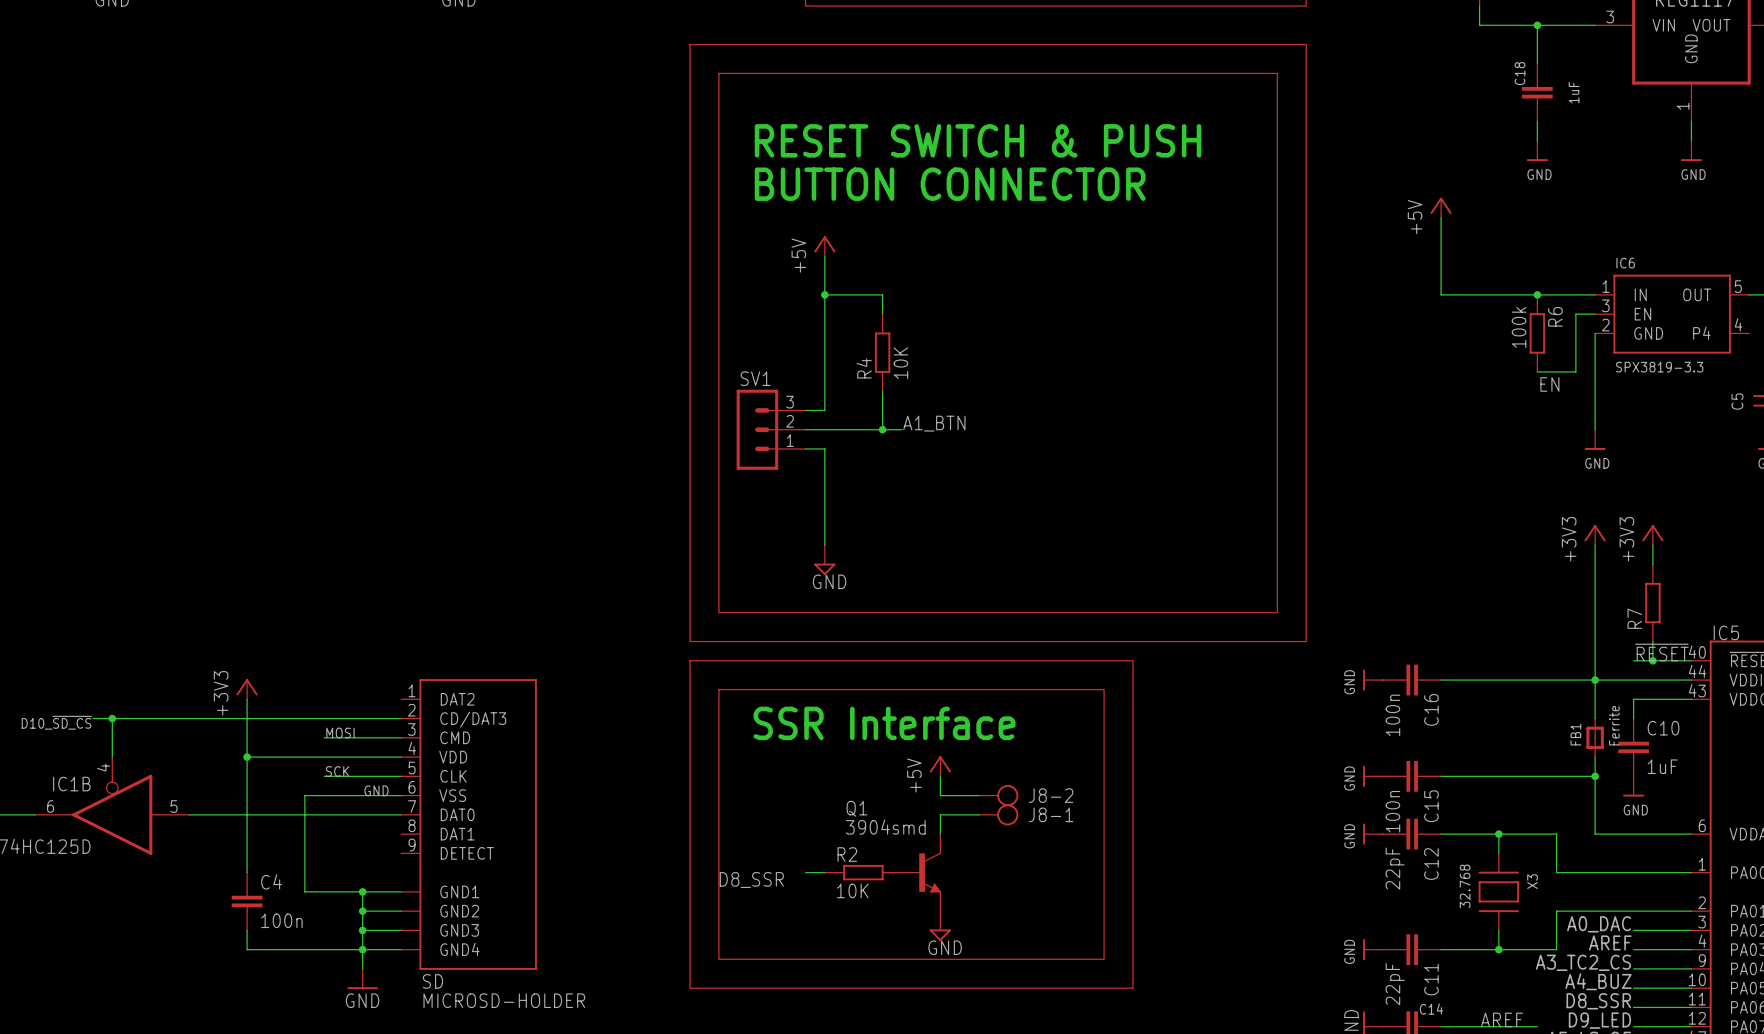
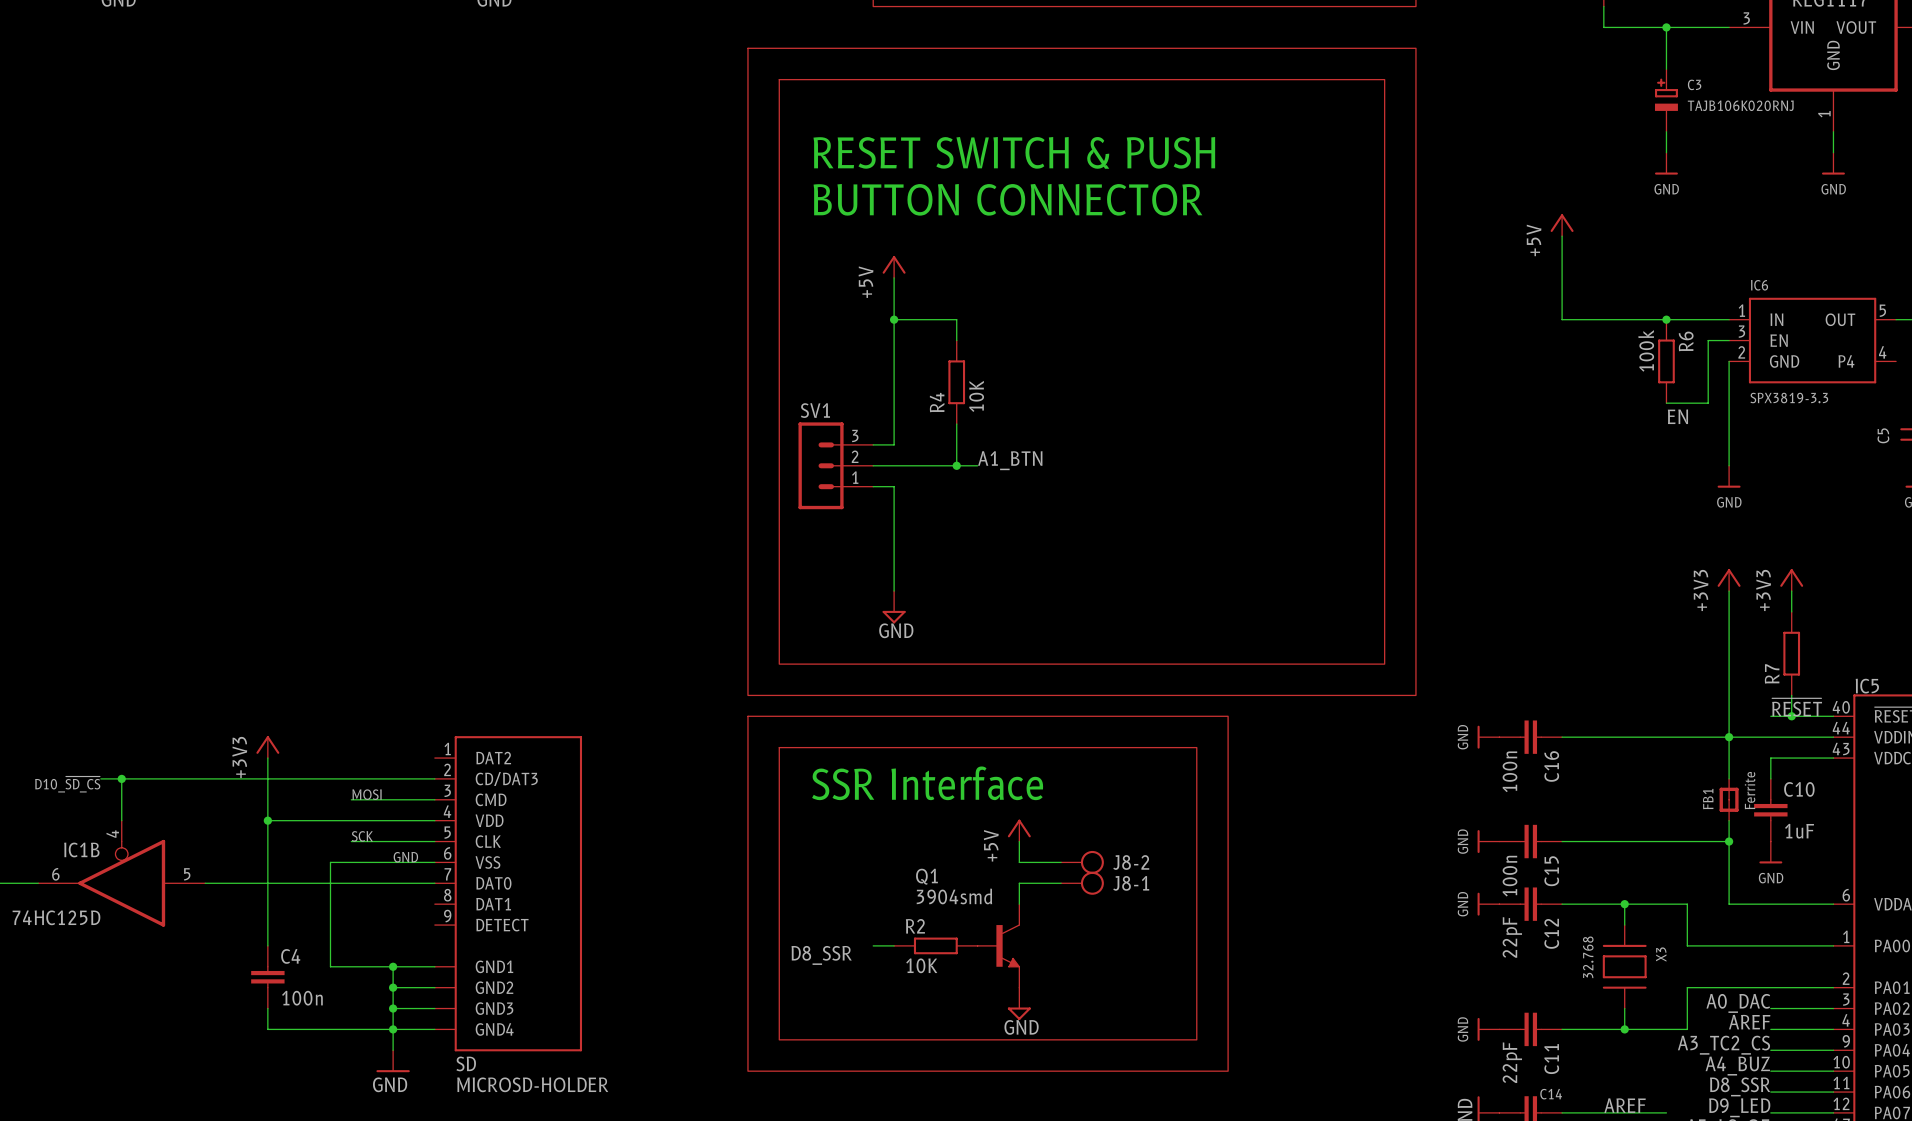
C18: 1uF (1537, 92) -> none
C3: none -> TAJB106K020RNJ (1666, 100)

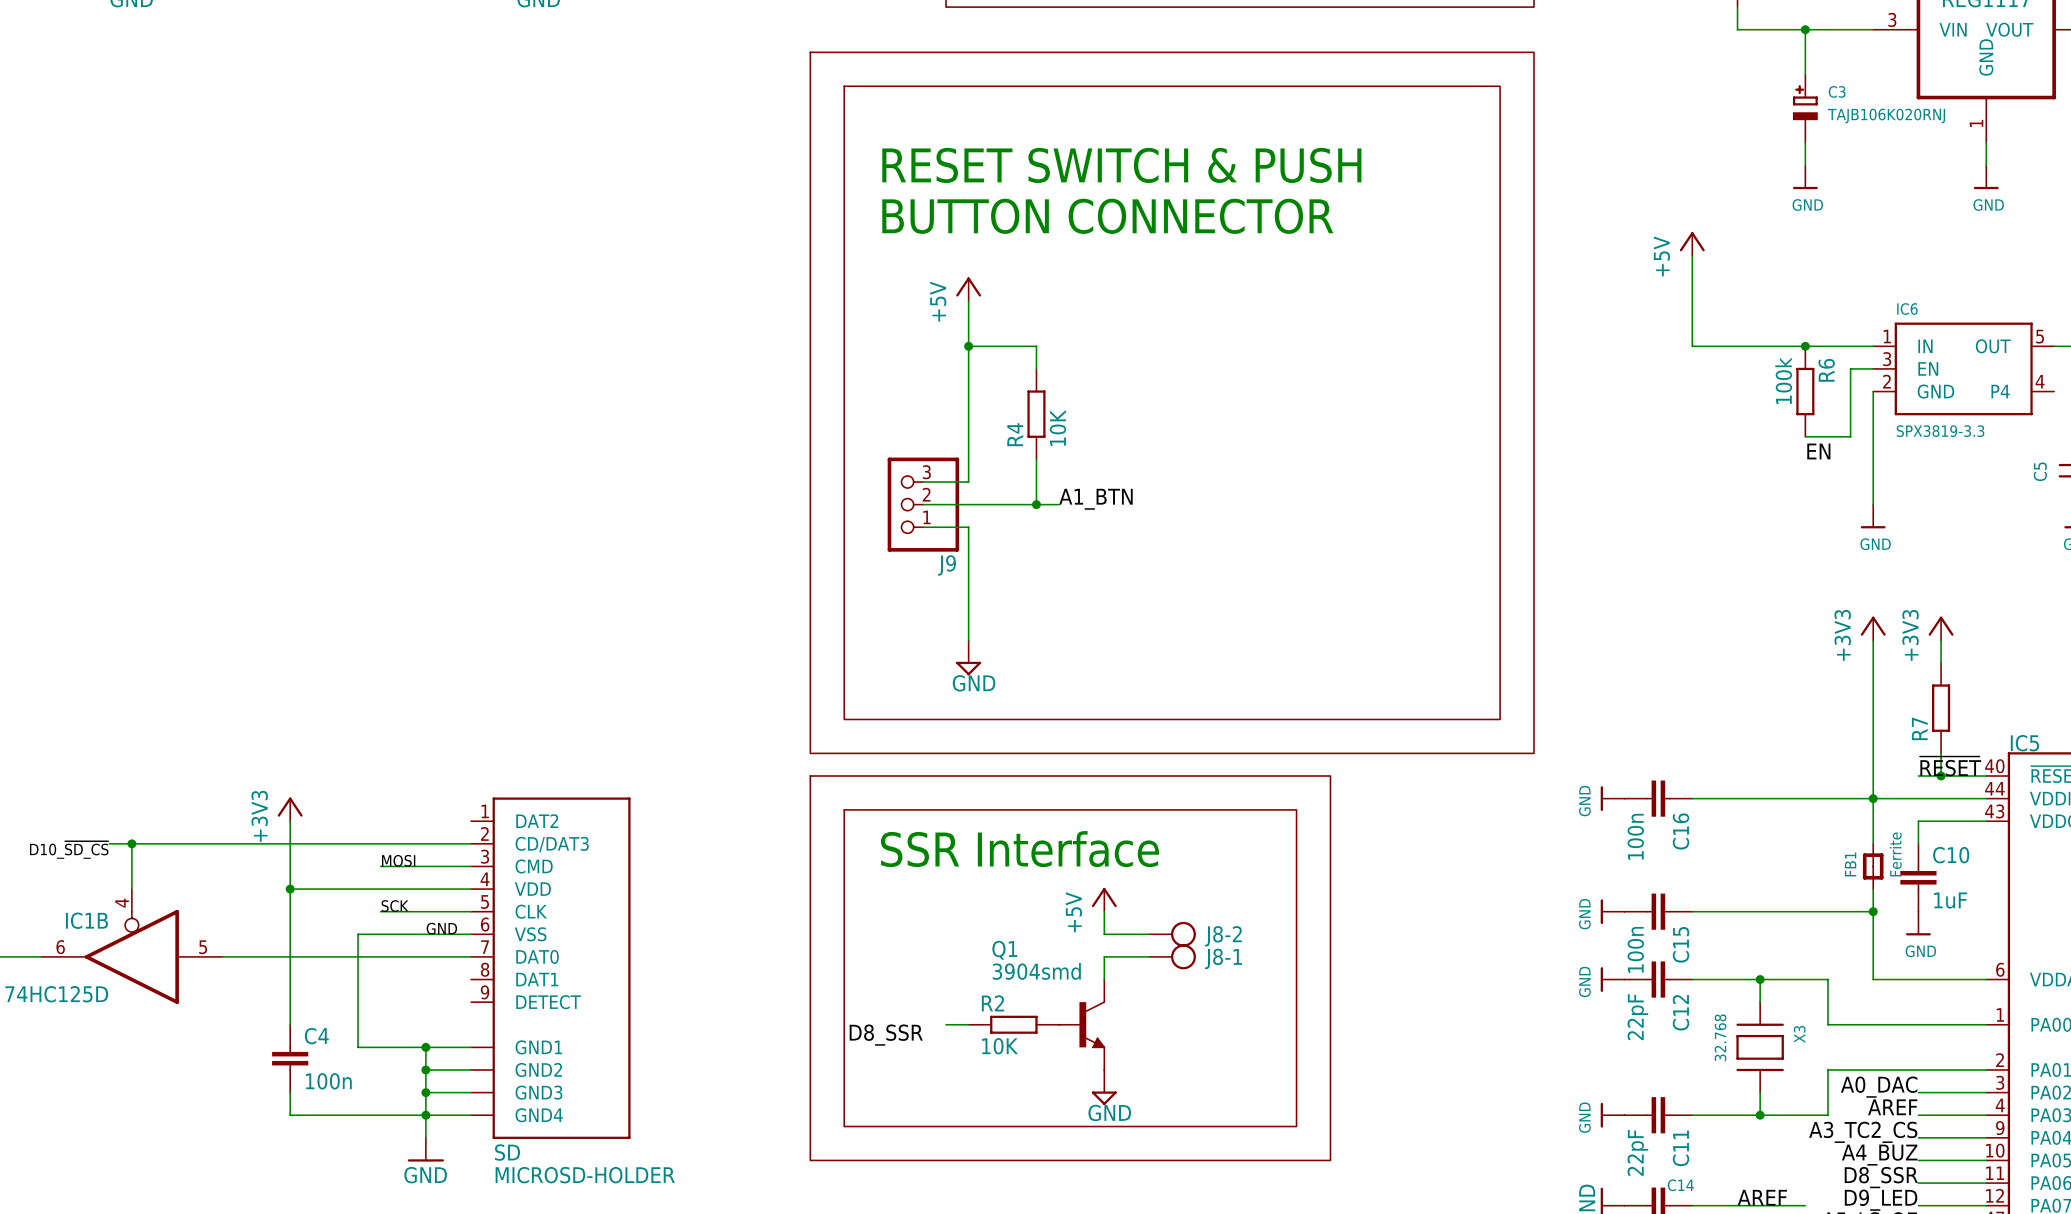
SV1: (835, 465) -> none
J9: none -> (923, 504)

